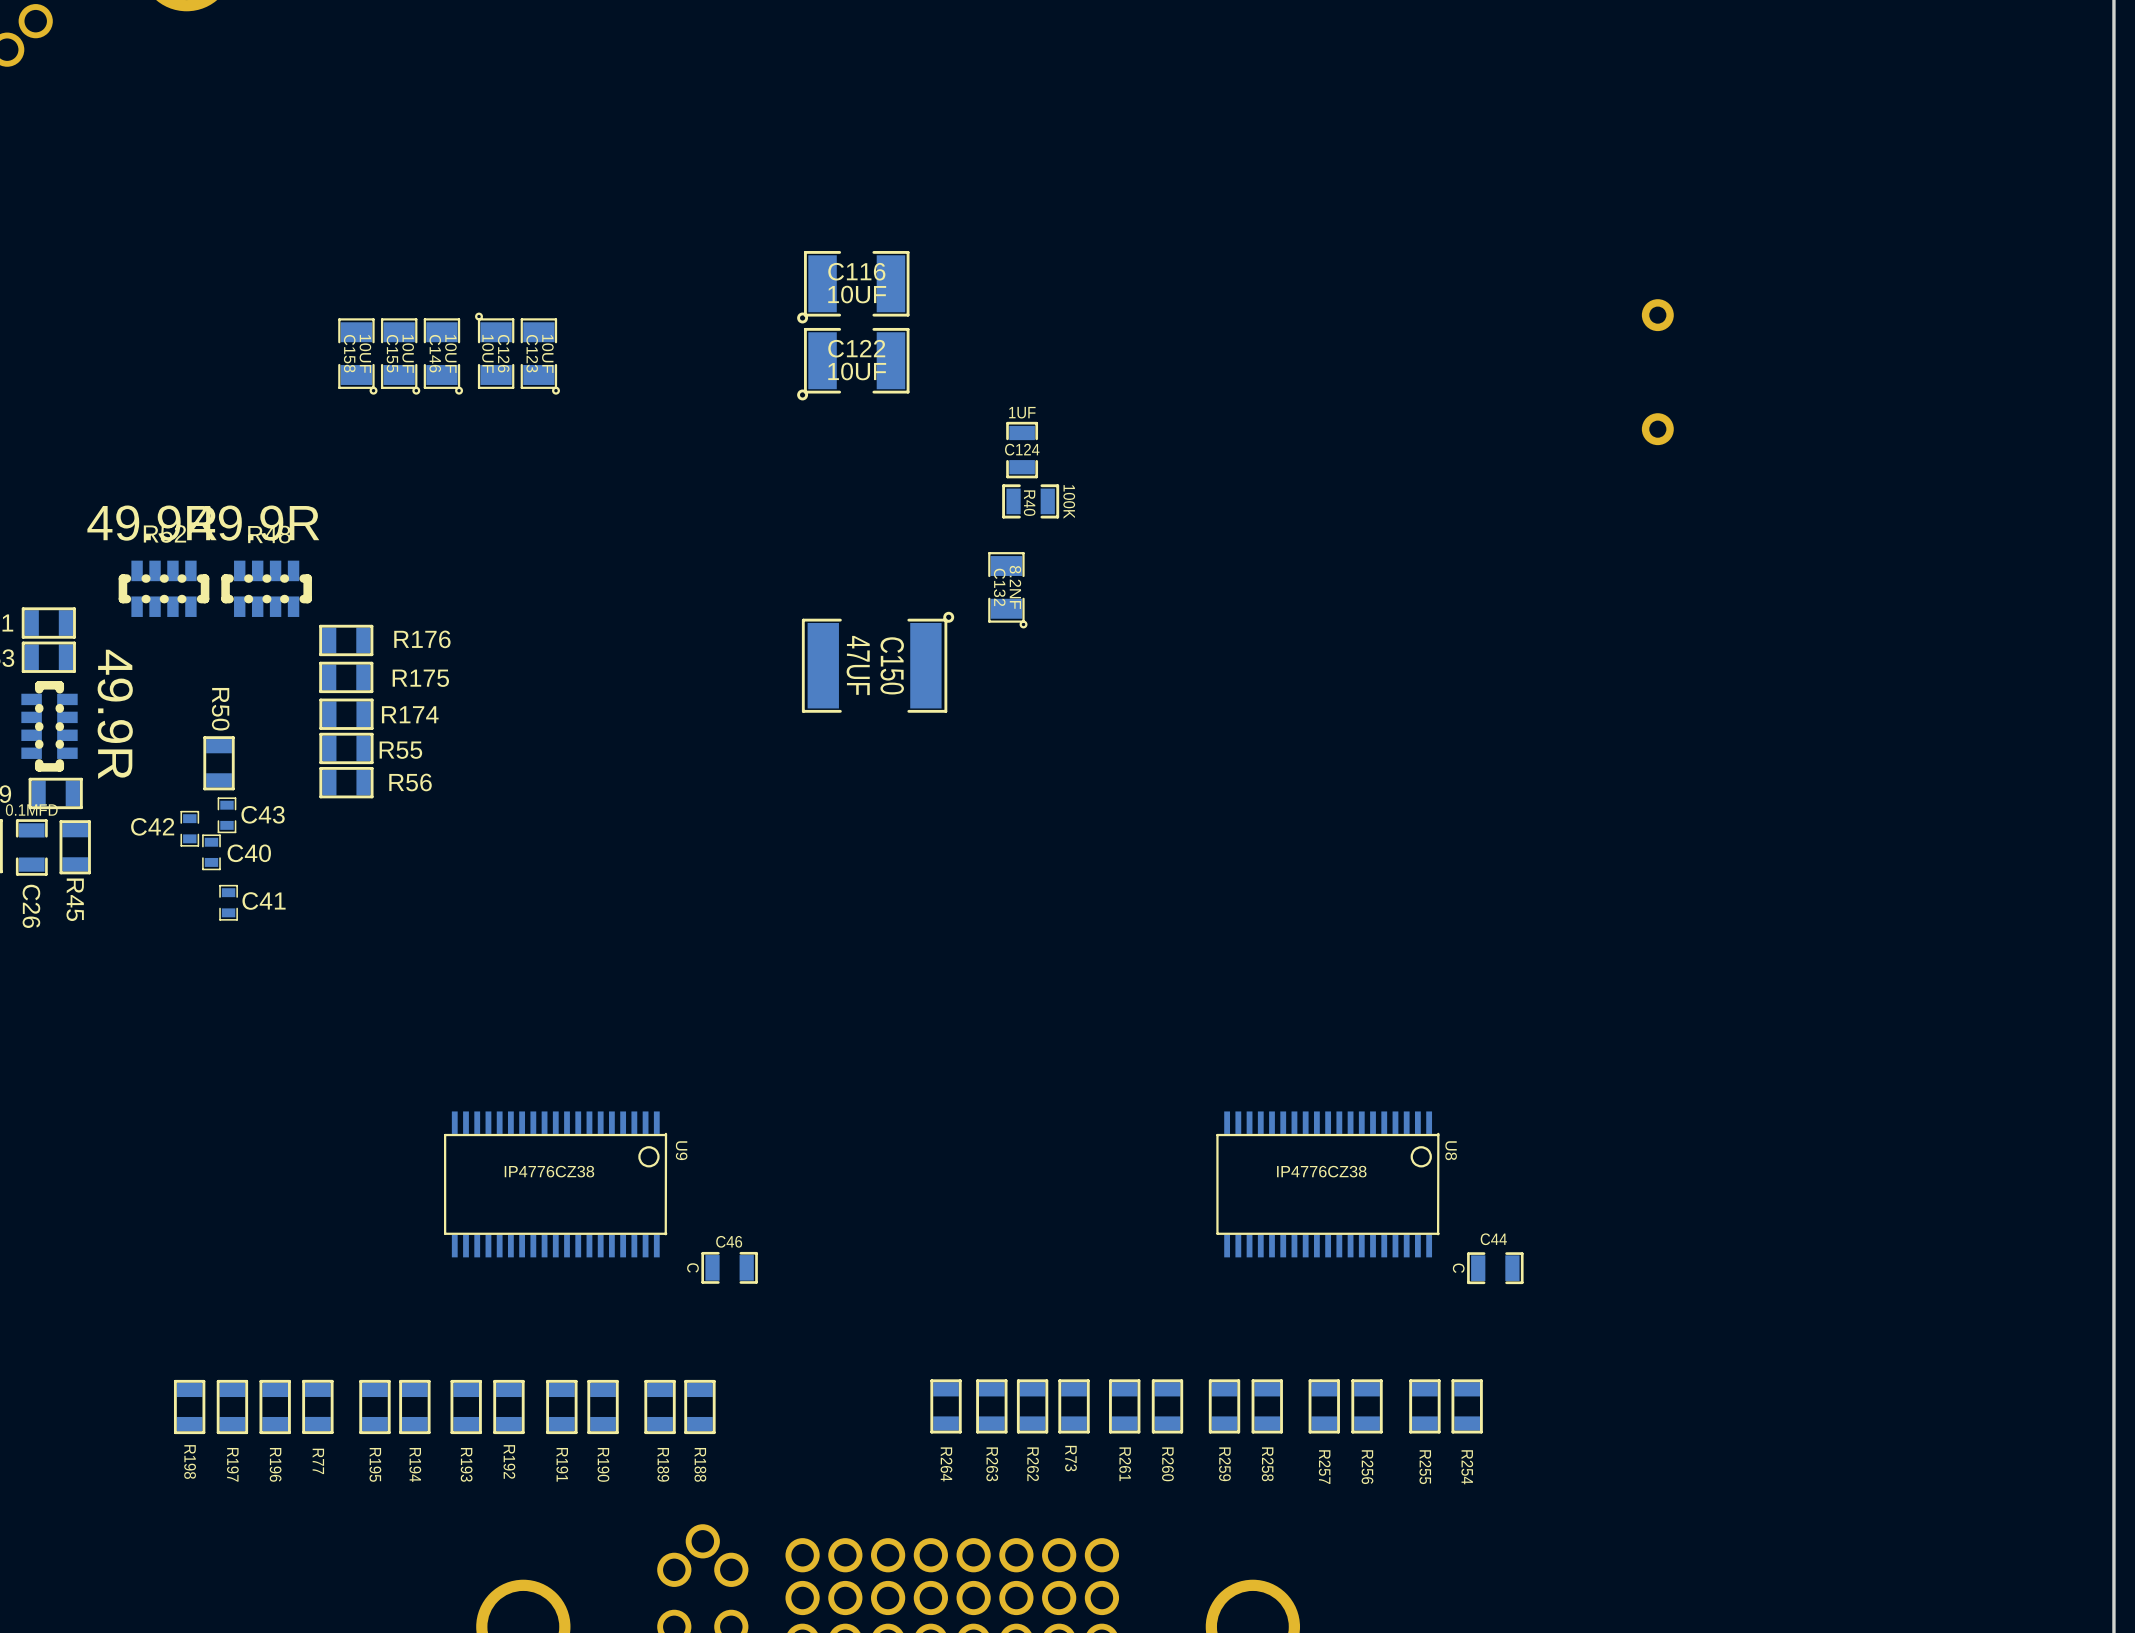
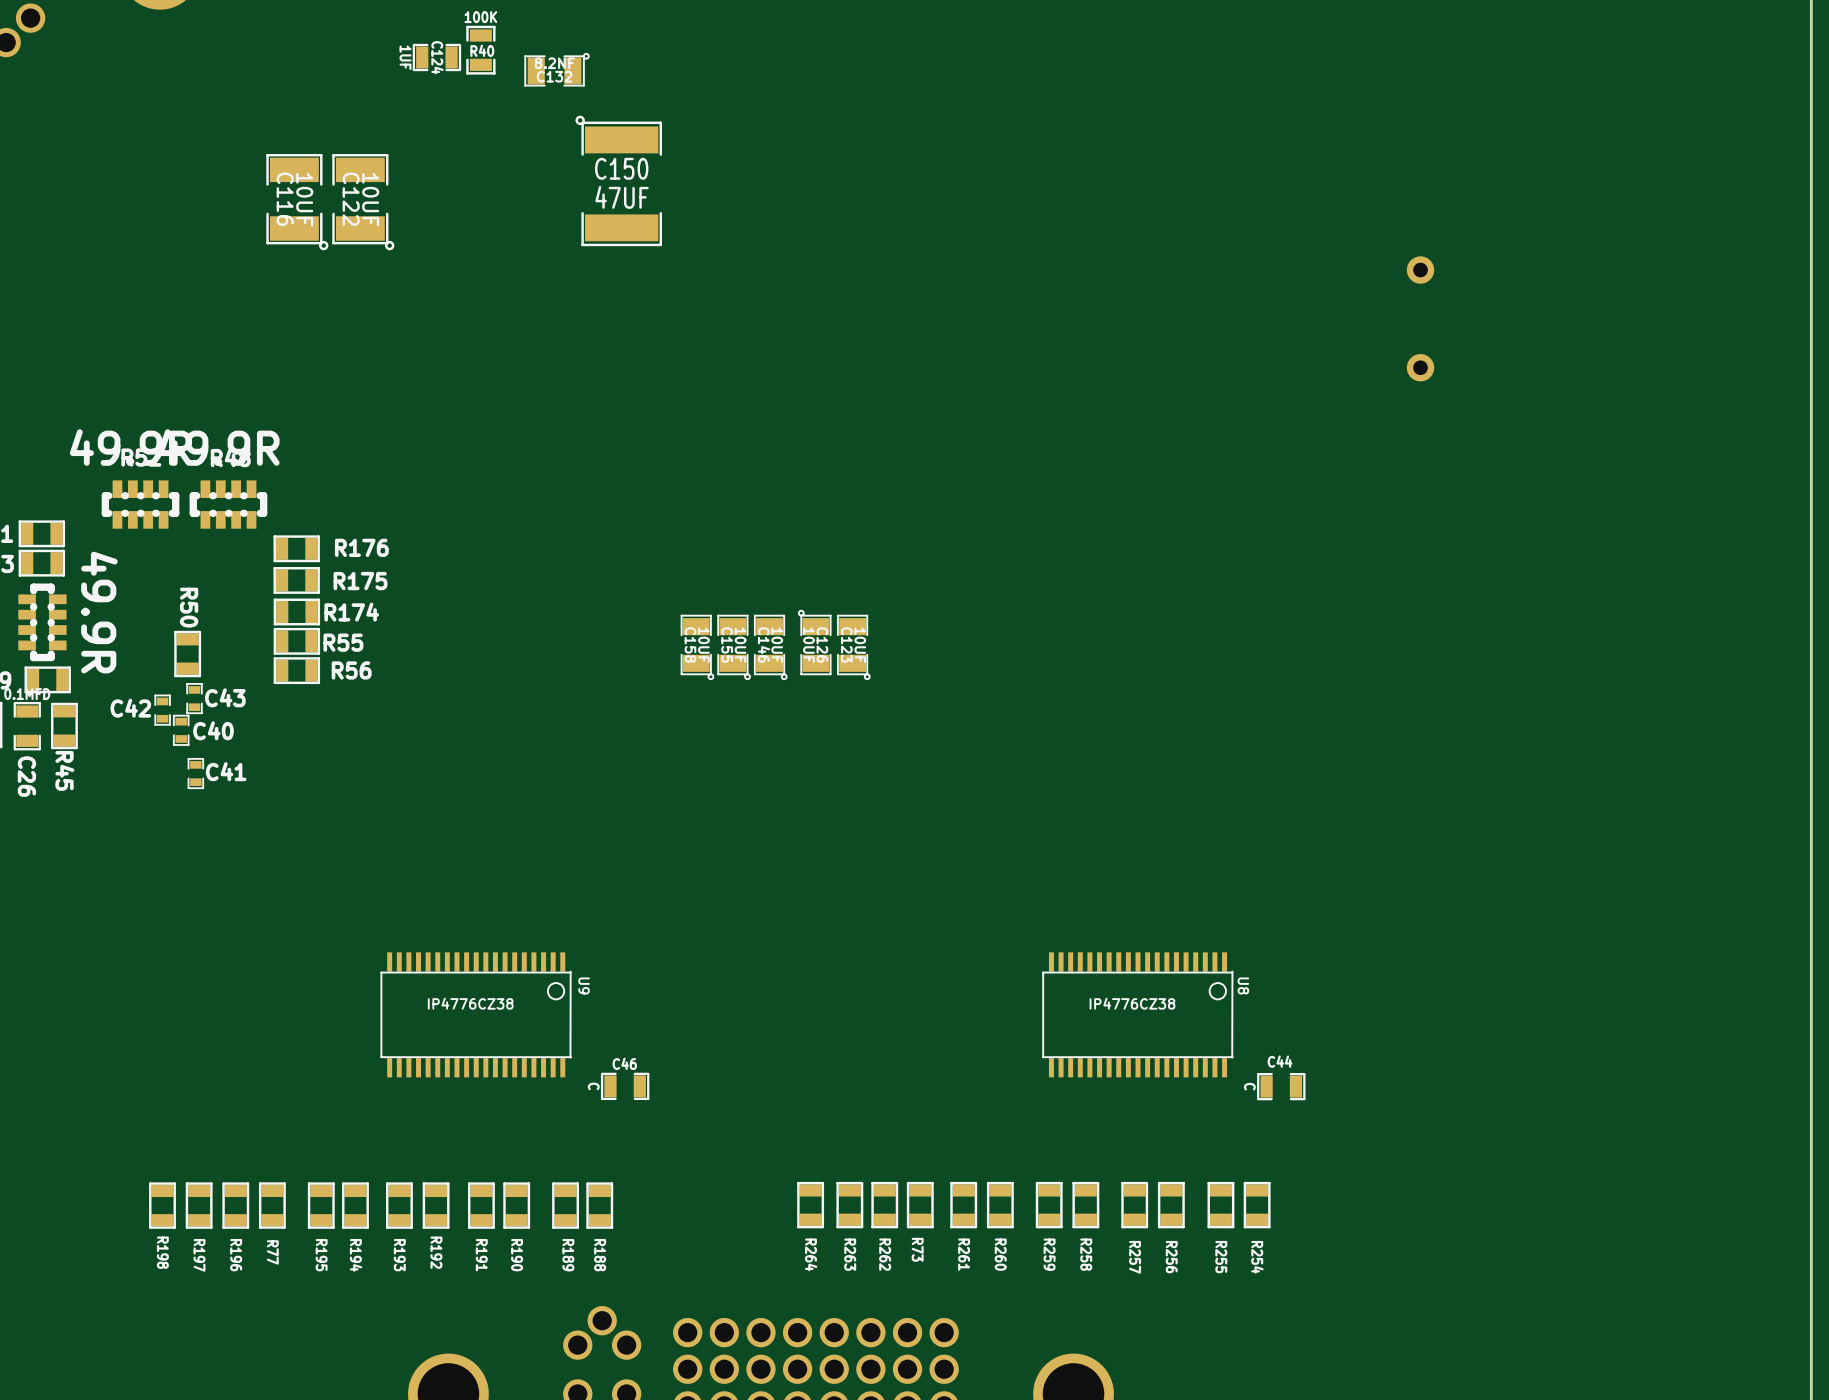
C116 rotation: 0° (853, 287) -> 90° counterclockwise (297, 202)
C116 position: (853, 287) -> (297, 202)
C126 position: (494, 350) -> (814, 642)
C158 position: (357, 356) -> (697, 647)
C155 position: (400, 356) -> (734, 647)
C146 position: (443, 356) -> (770, 647)
C123 position: (540, 356) -> (853, 647)
C122 rotation: 0° (853, 364) -> 90° counterclockwise (363, 202)
C122 position: (853, 364) -> (363, 202)
C124 value position: 1UF (1022, 412) -> 1UF (405, 57)
C124 rotation: 0° (1022, 450) -> 90° clockwise (436, 57)
C124 position: (1022, 450) -> (436, 57)
R40 rotation: 0° (1030, 501) -> 90° clockwise (480, 50)
R40 position: (1030, 501) -> (480, 50)
R40 value position: 100K (1069, 501) -> 100K (480, 17)
C132 rotation: 0° (1007, 590) -> 90° counterclockwise (557, 69)
C132 position: (1007, 590) -> (557, 69)
C150 rotation: 0° (878, 662) -> 90° counterclockwise (618, 180)
C150 position: (878, 662) -> (618, 180)

